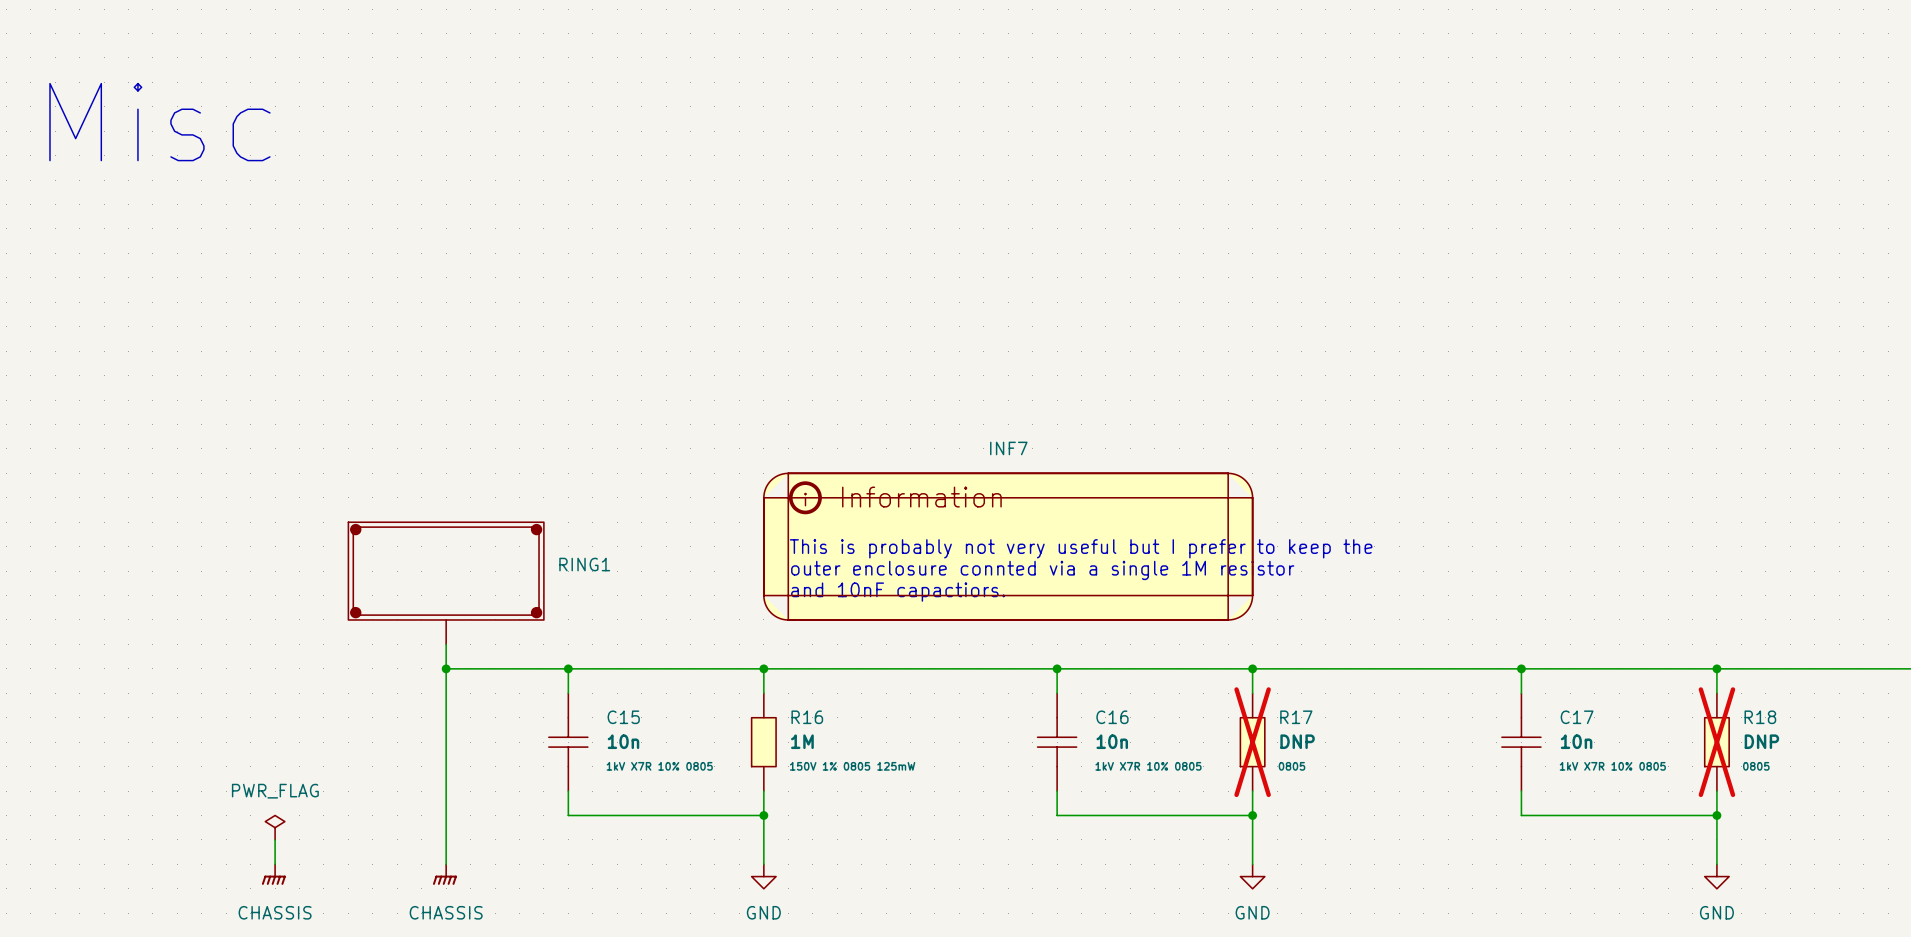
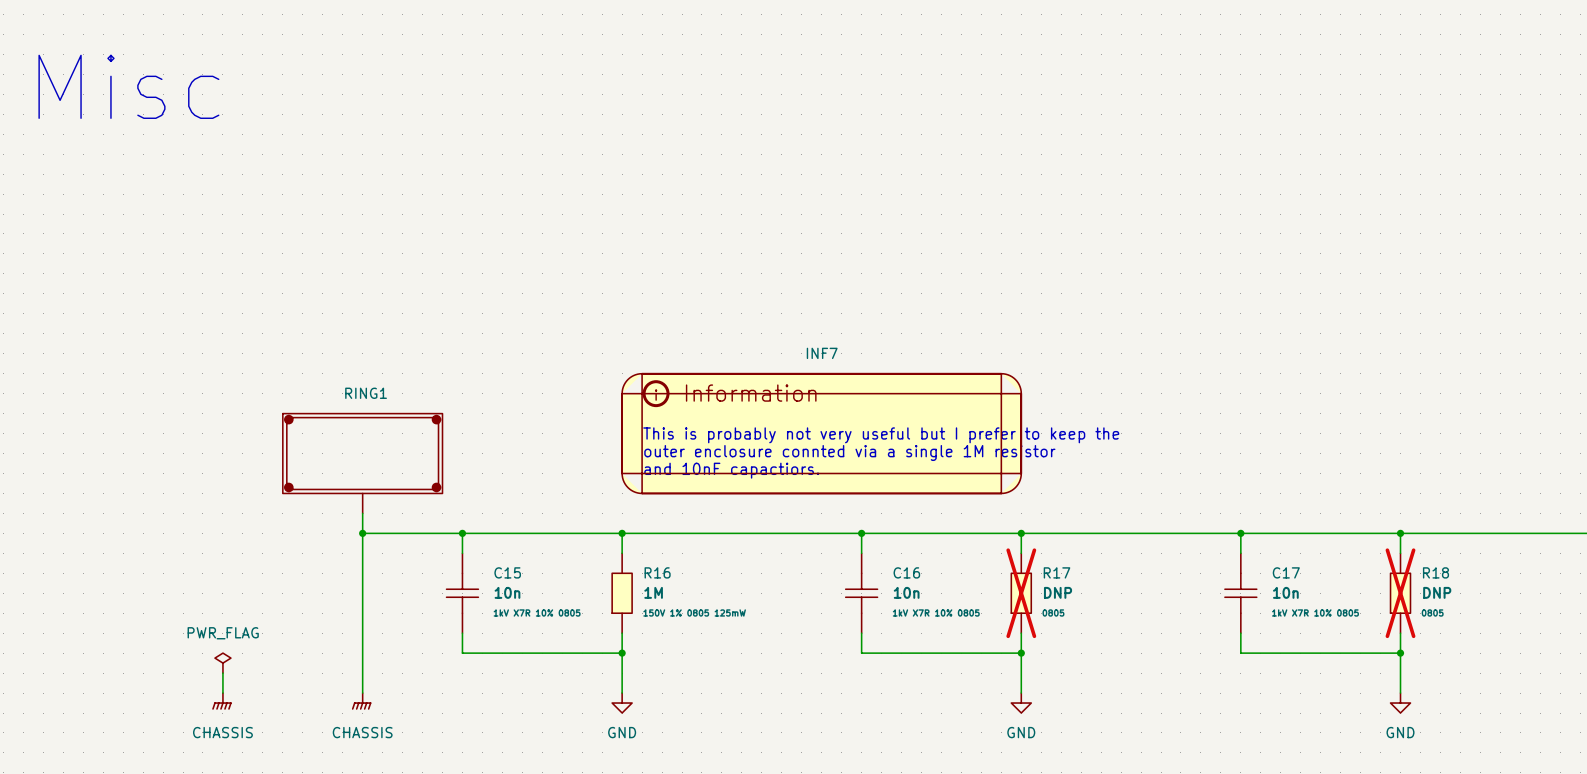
RING1 name position: RING1 (584, 564) -> RING1 (366, 393)

